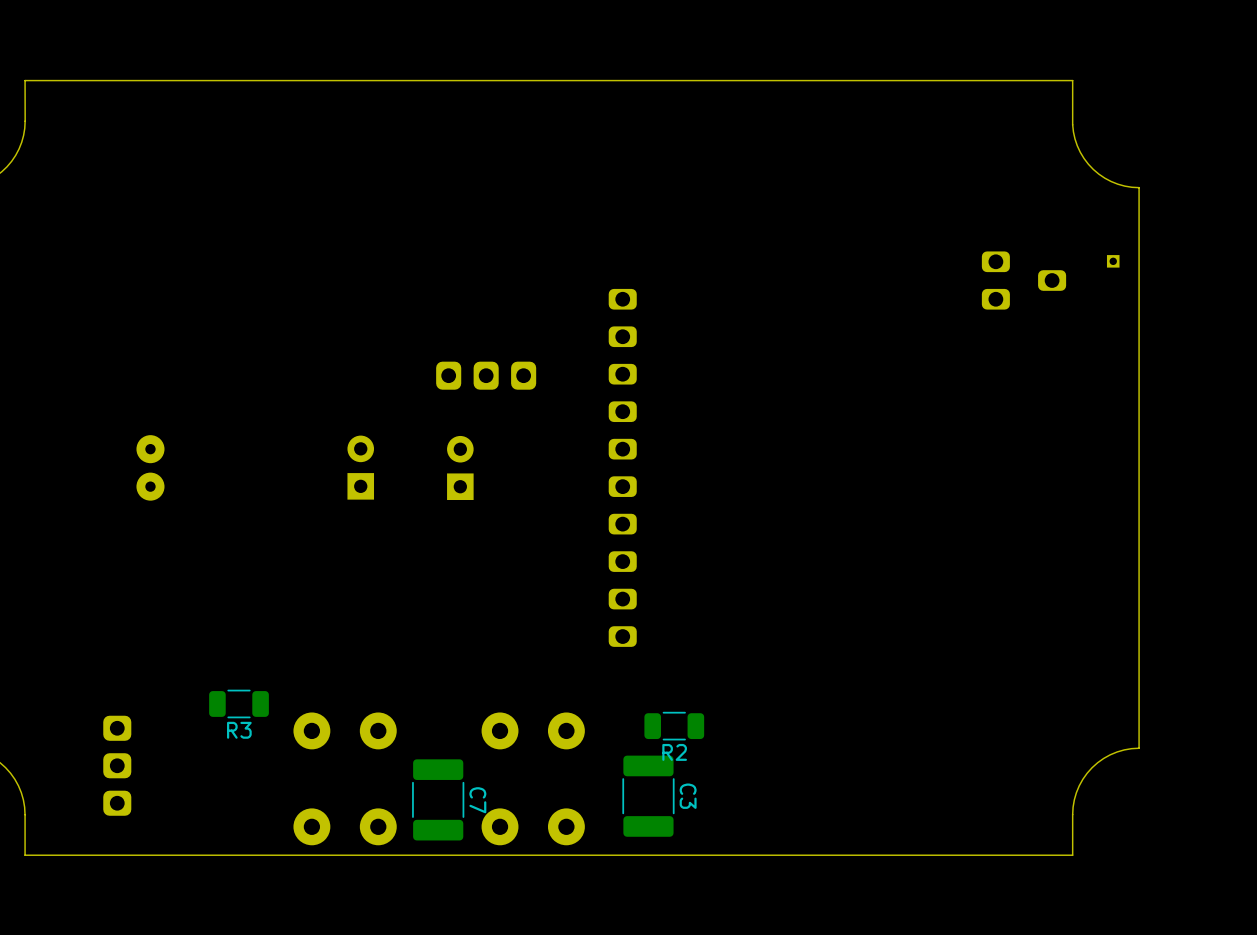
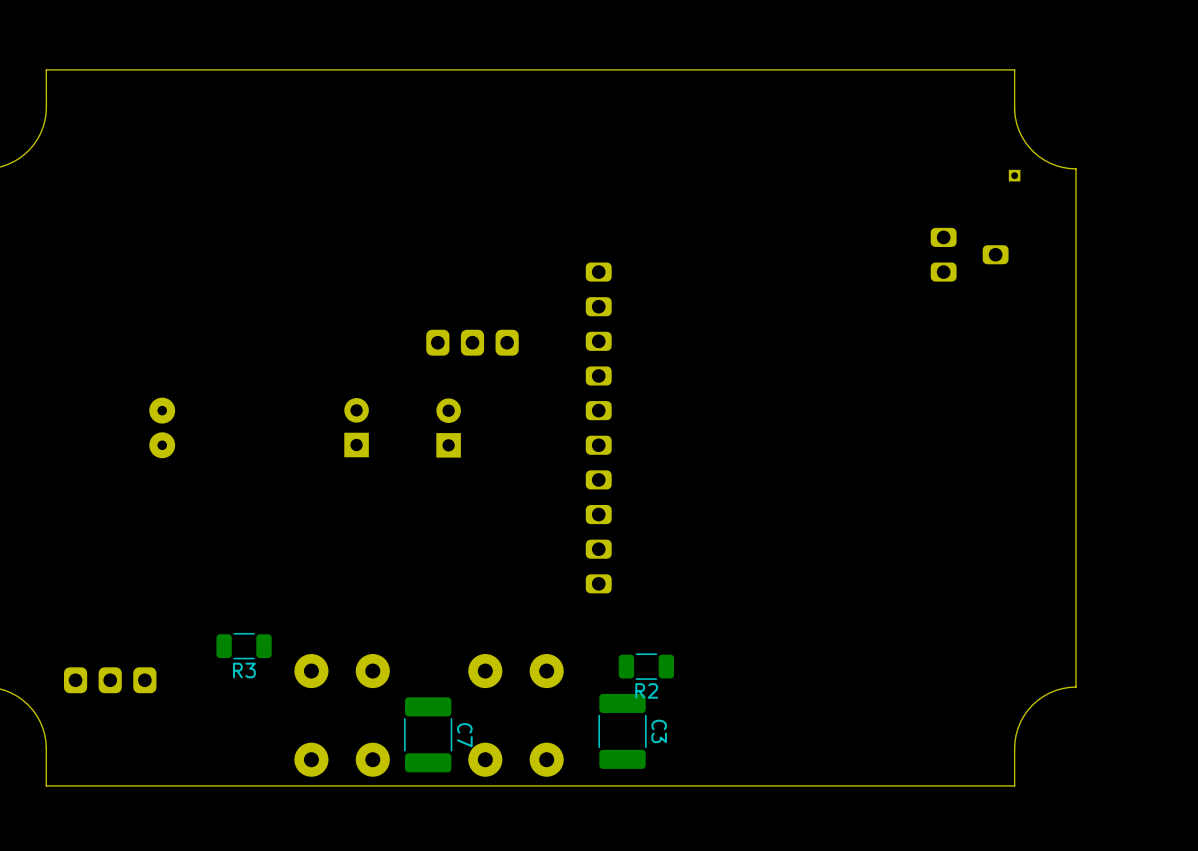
part position: (1113, 261) -> (1014, 175)
part rotation: 0° (117, 765) -> 90° clockwise (110, 680)

